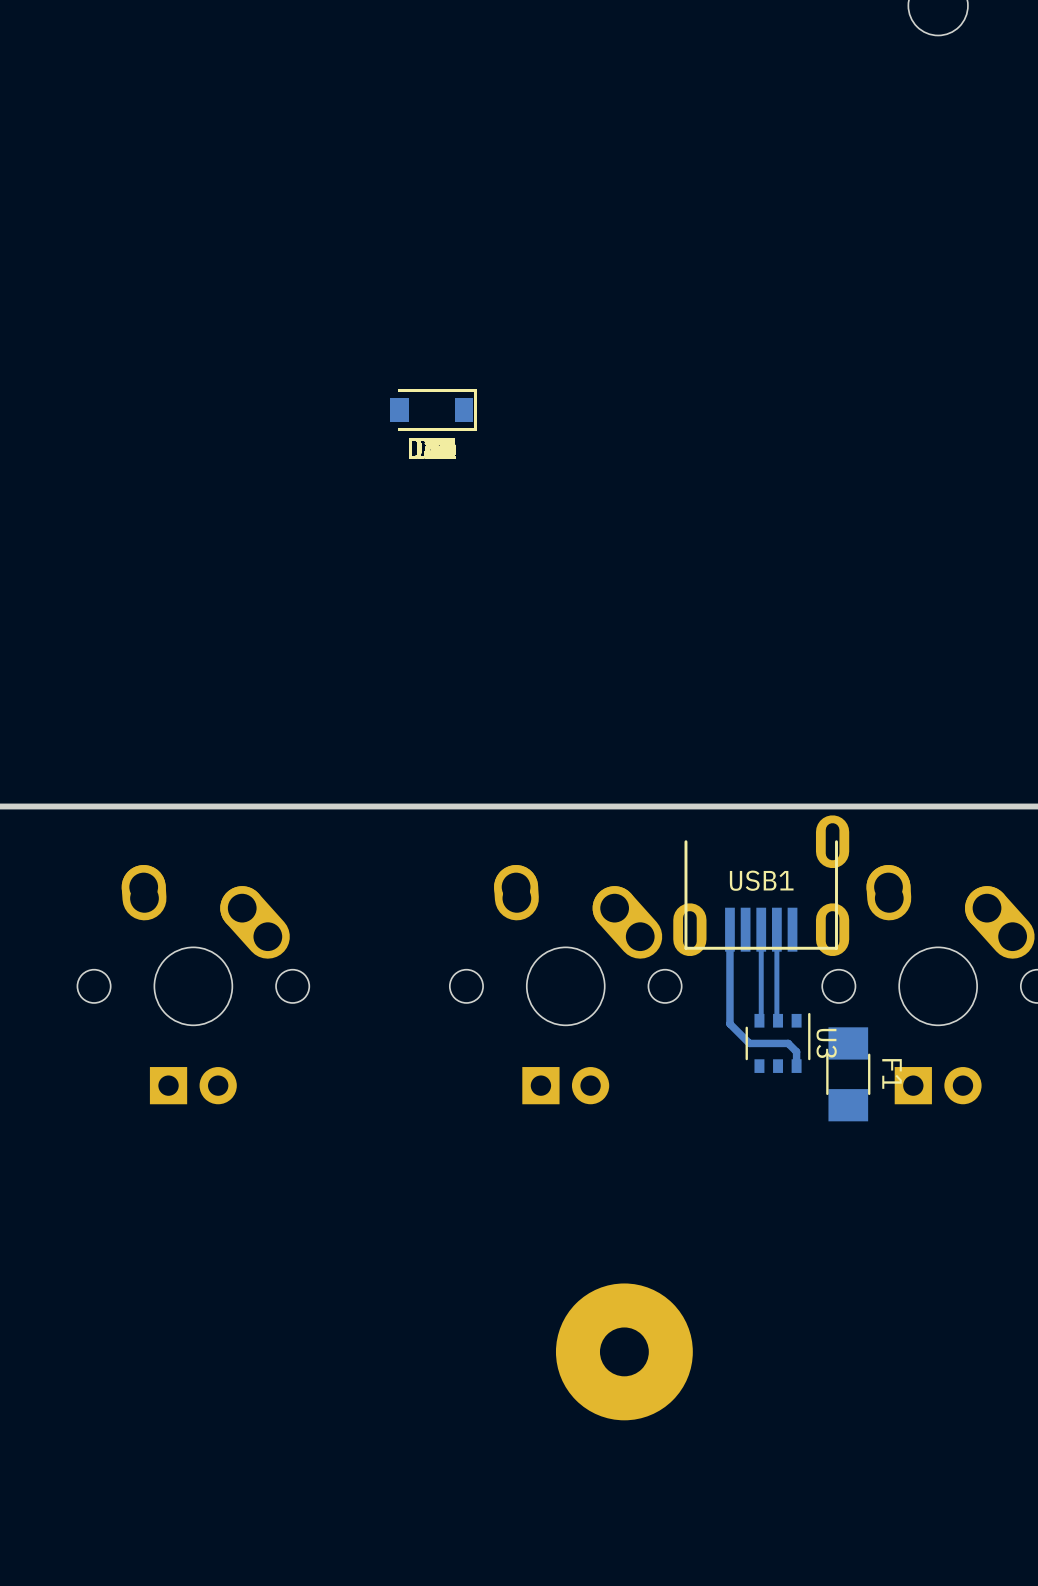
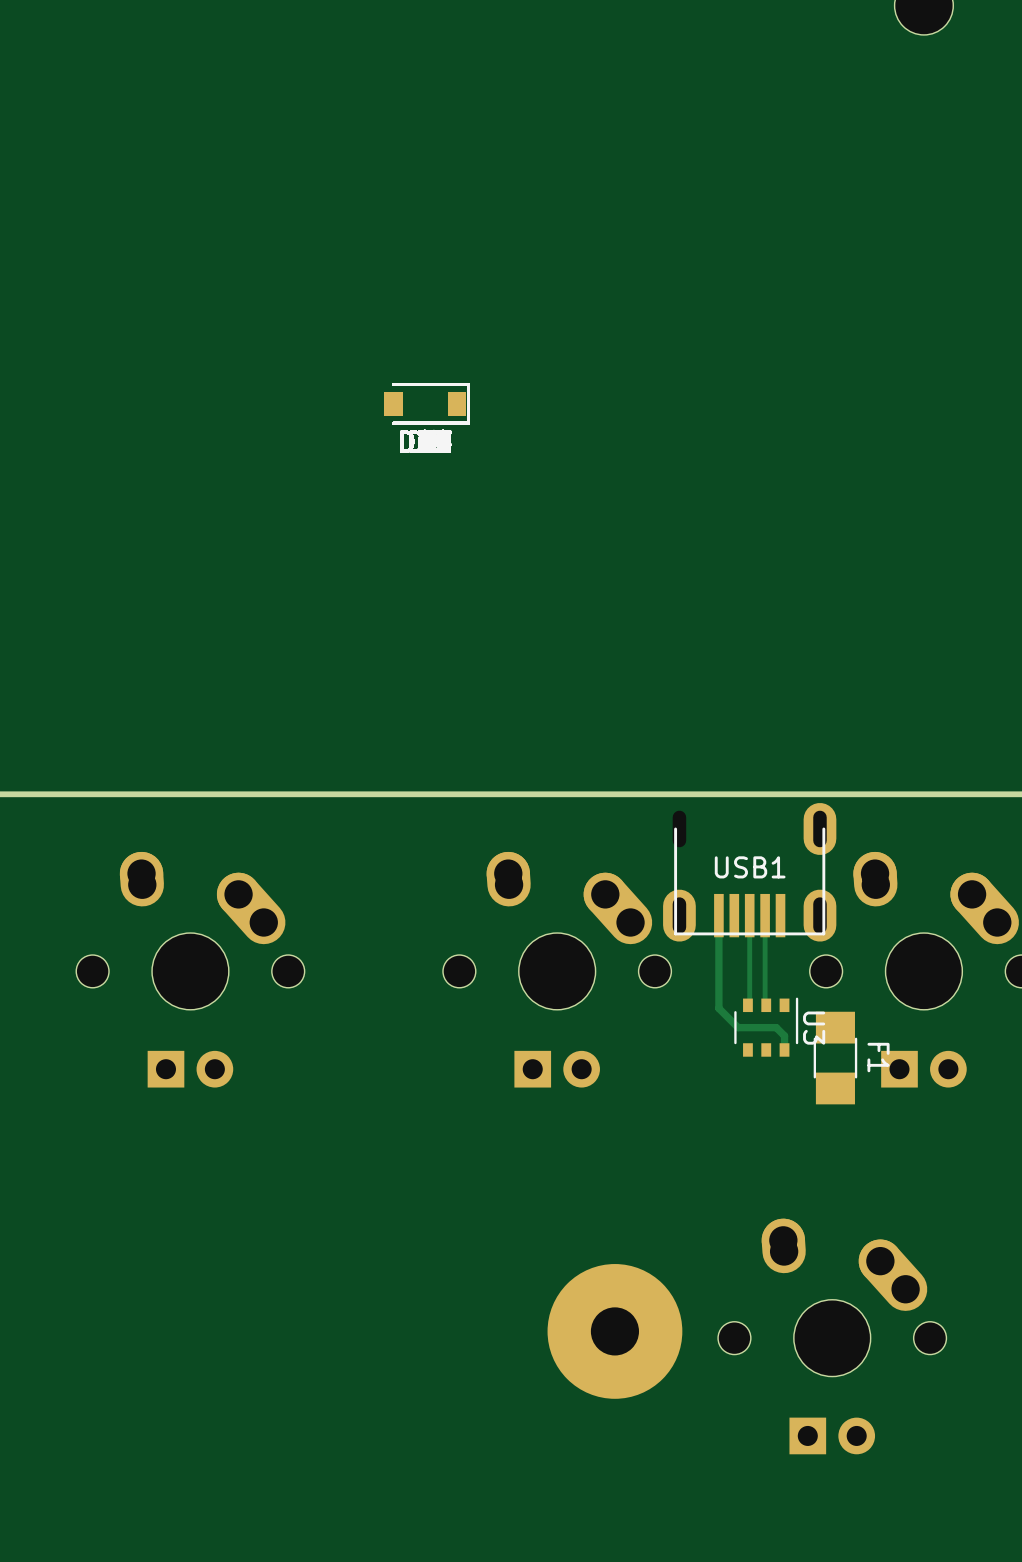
part: none -> (832, 1336)

